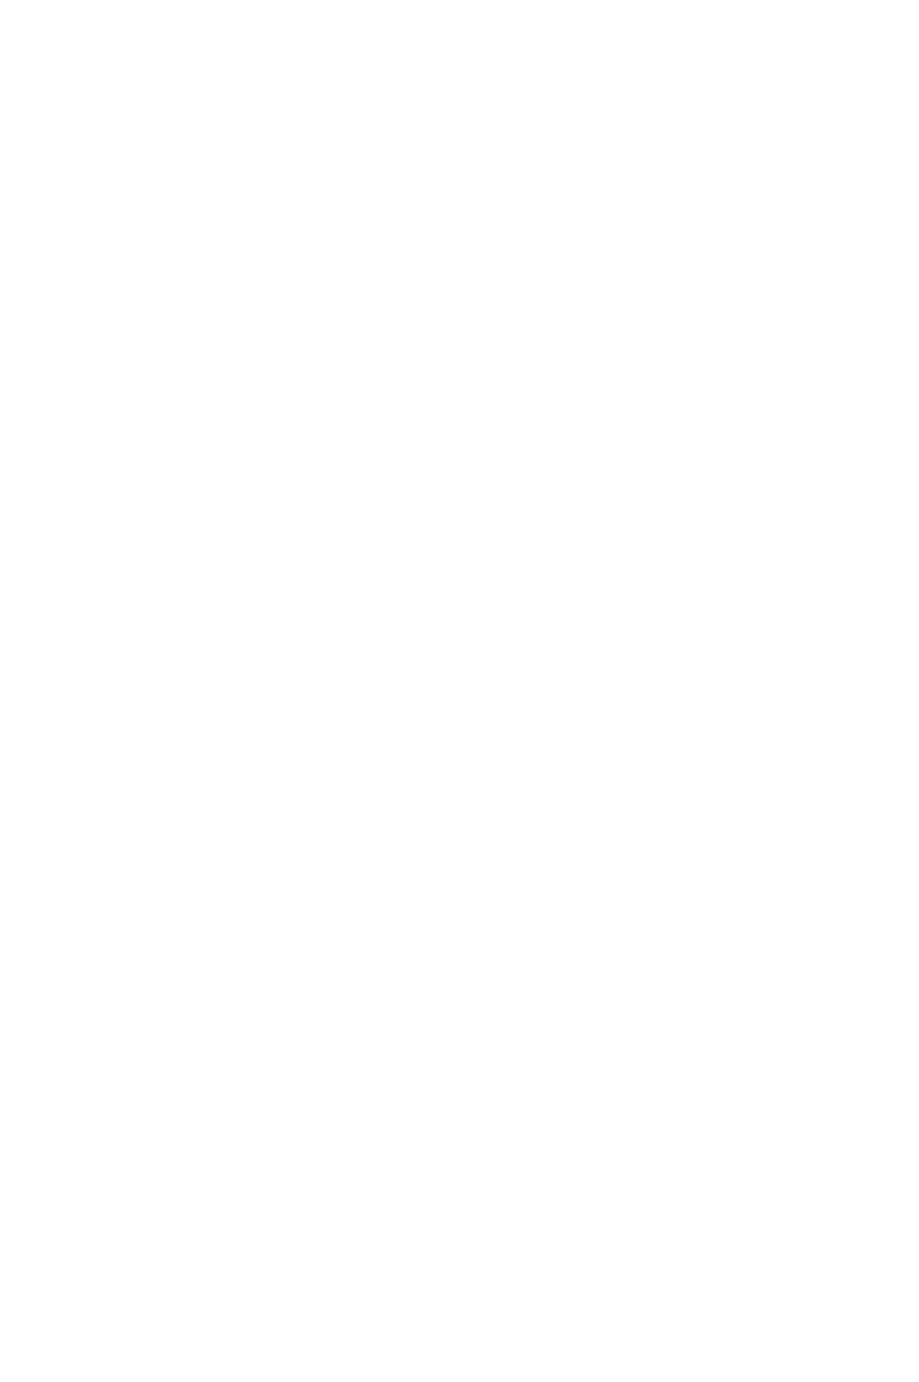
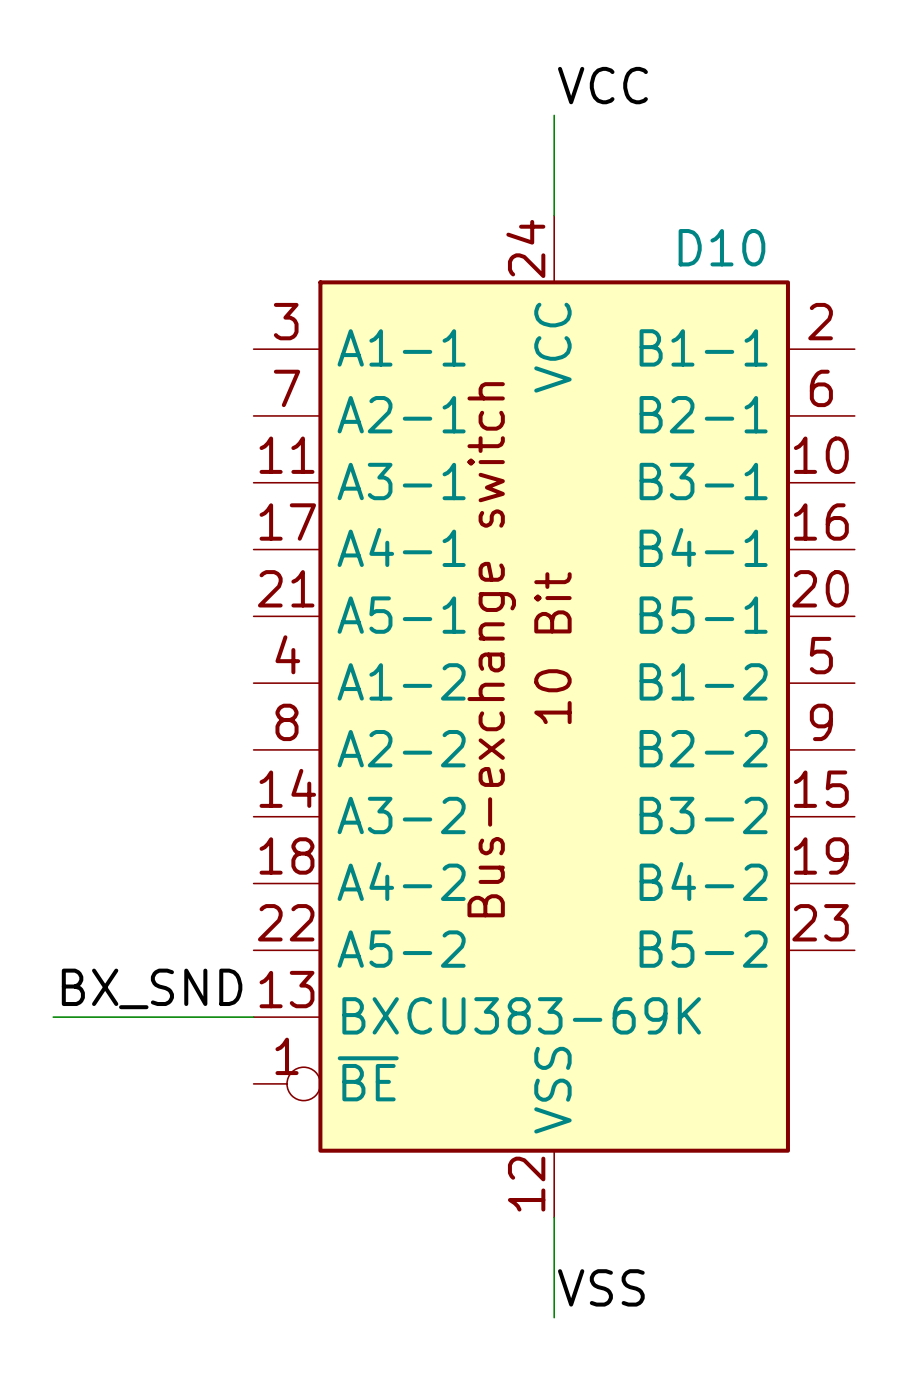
label: none -> VCC (602, 85)
wire: none -> (554, 115) (554, 215)
D10: none -> CU383-69K (554, 716)
label: none -> BX_SND (152, 988)
wire: none -> (53, 1017) (253, 1017)
wire: none -> (554, 1217) (554, 1317)
label: none -> VSS (601, 1287)

